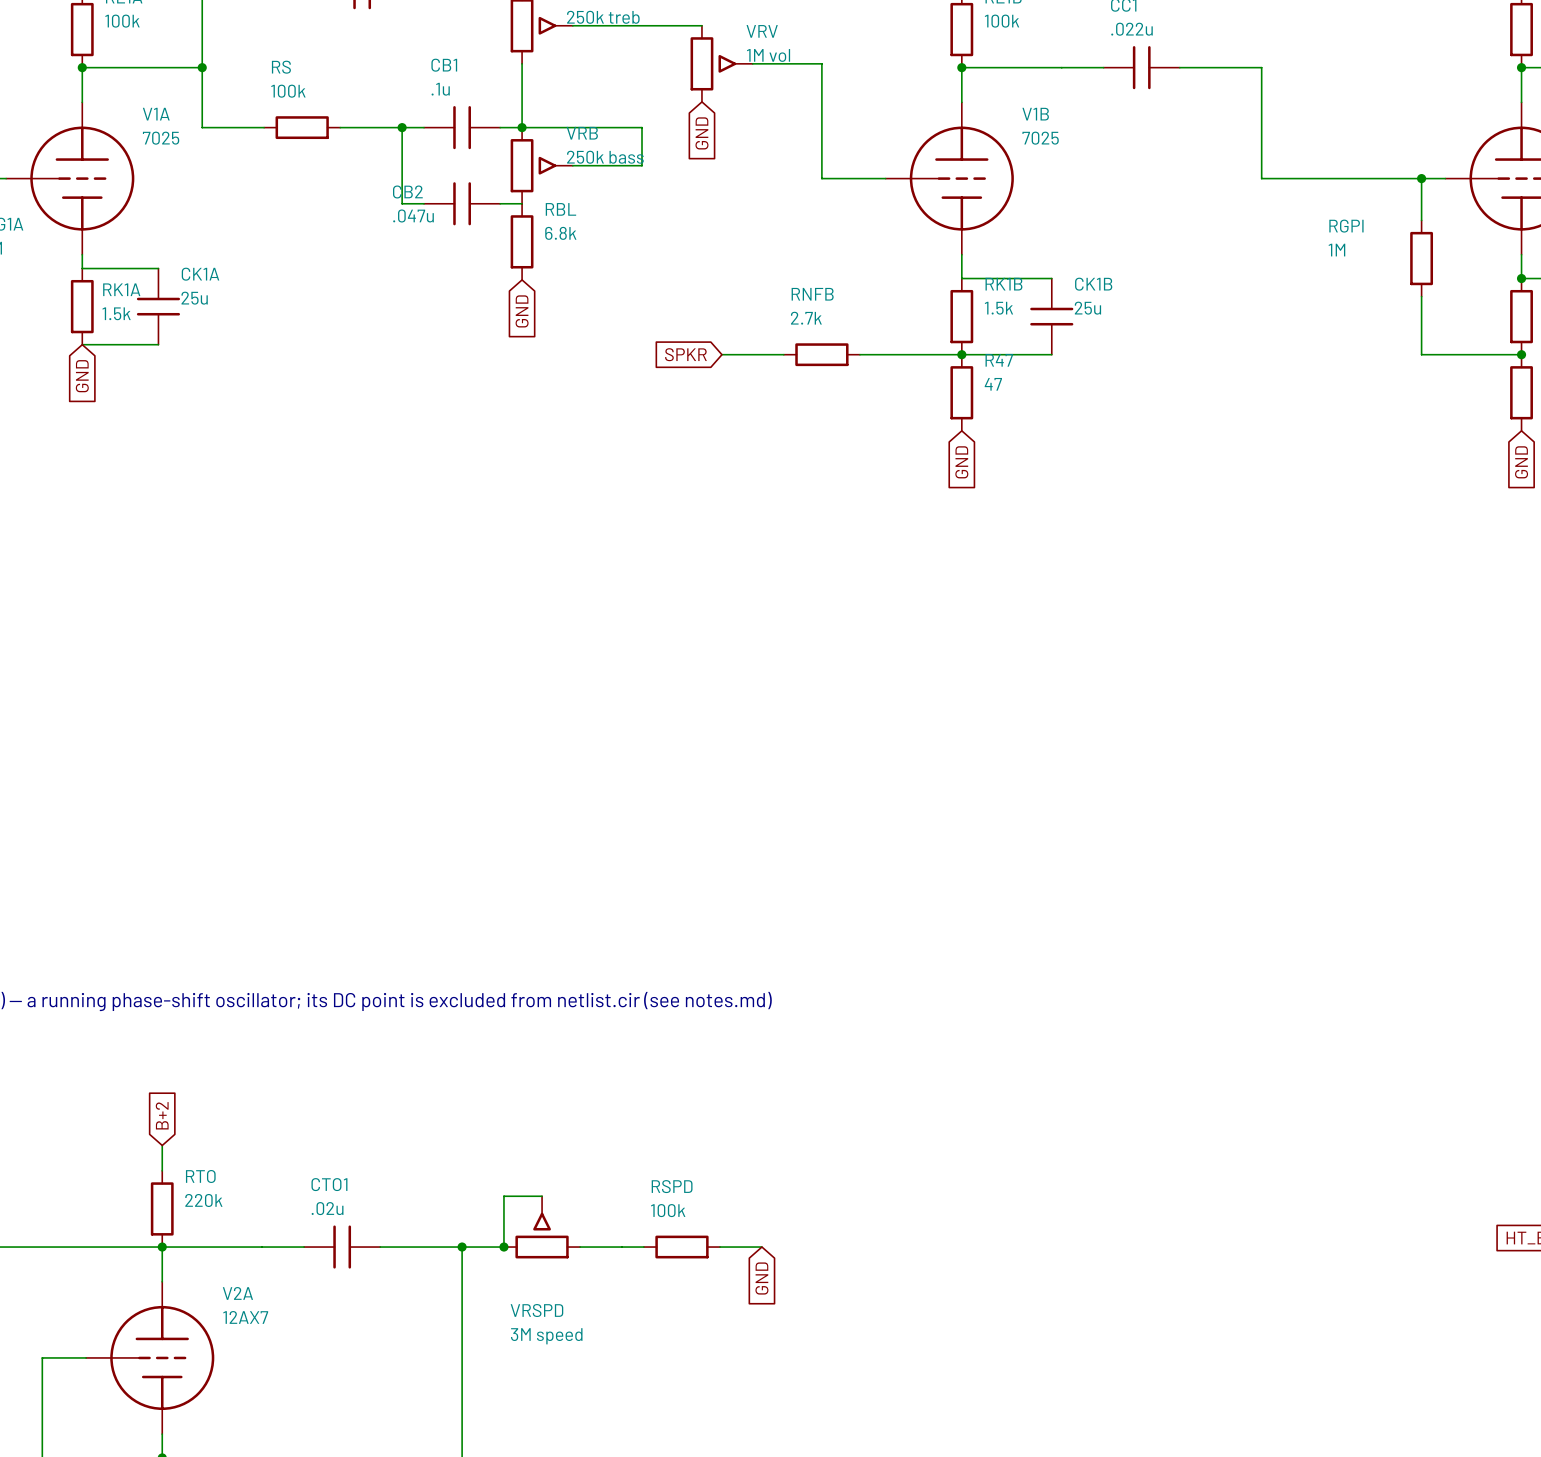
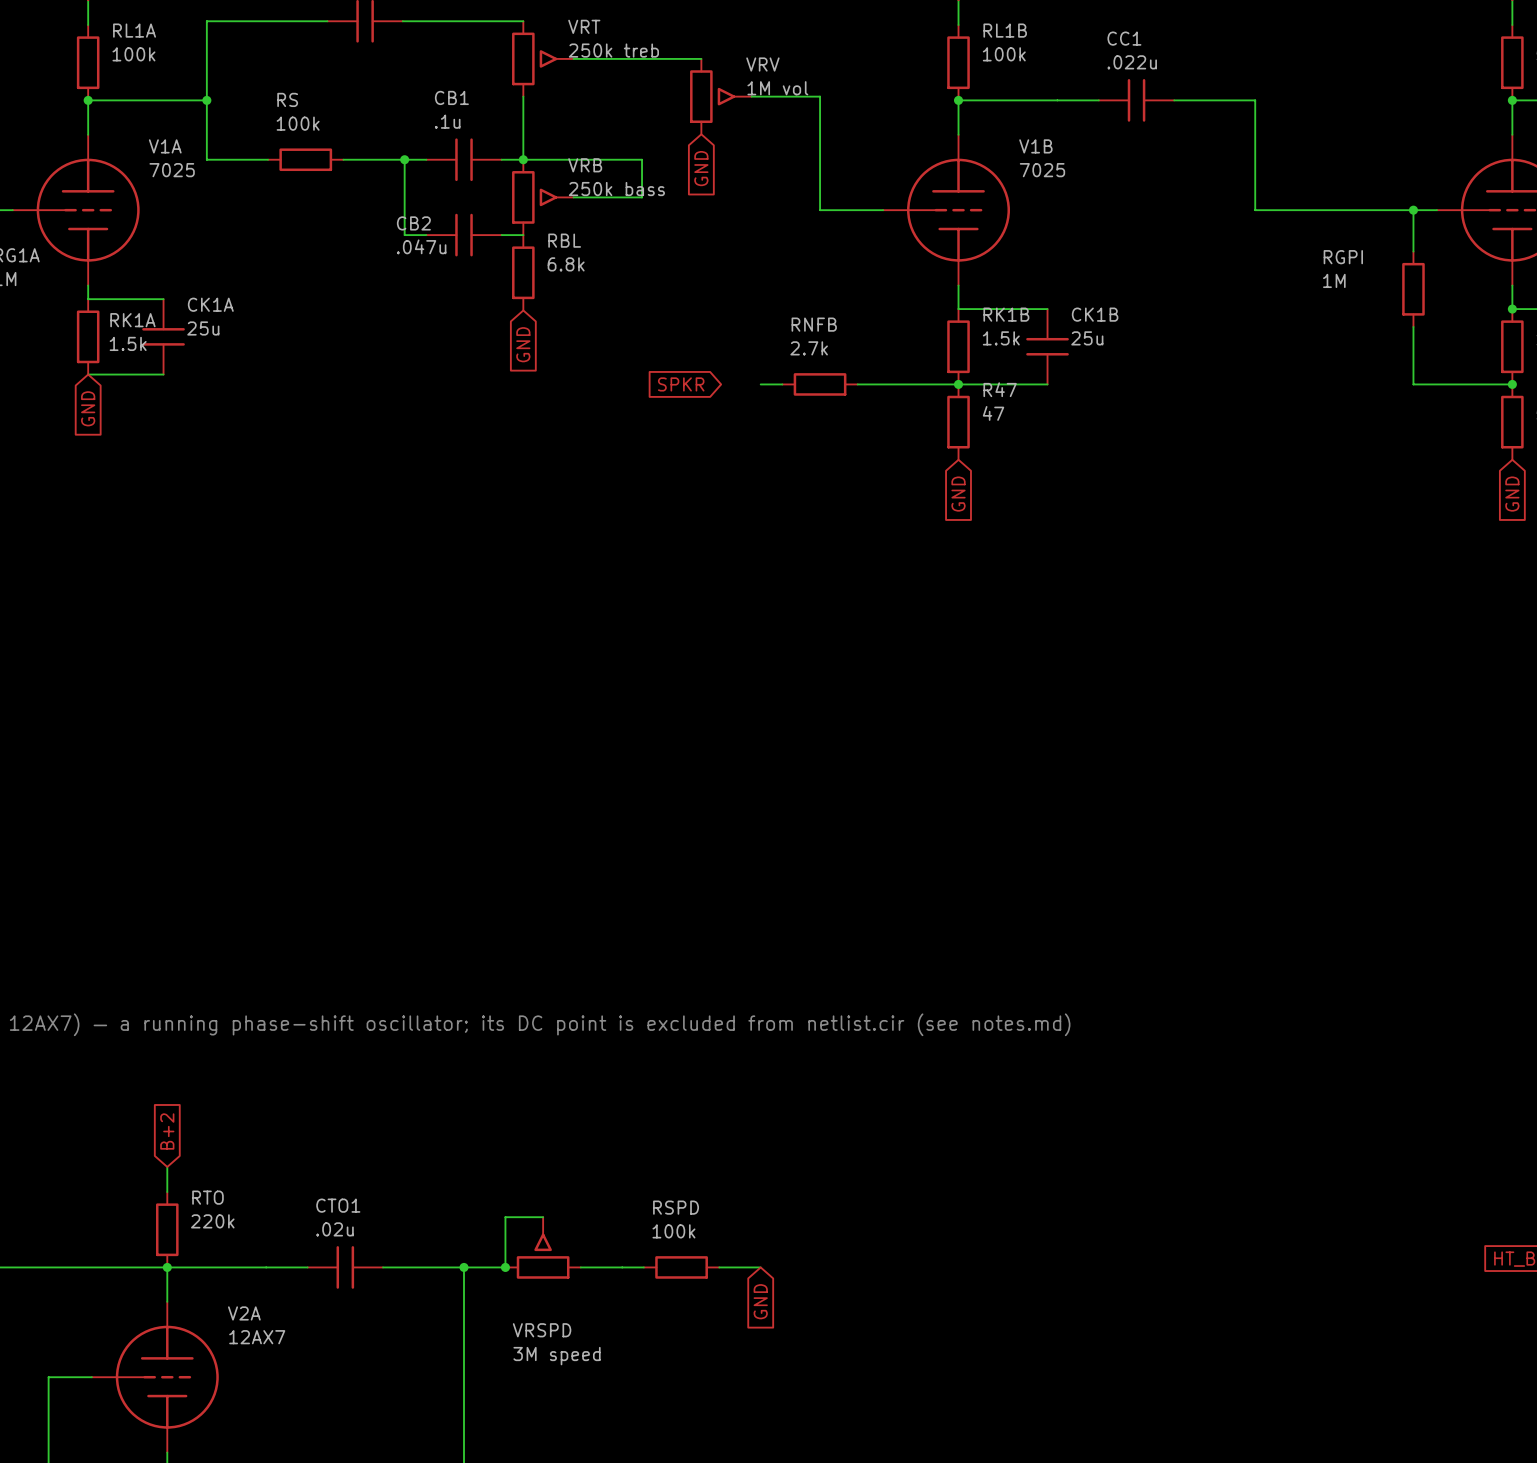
wire: (721, 354) (761, 354) -> none

